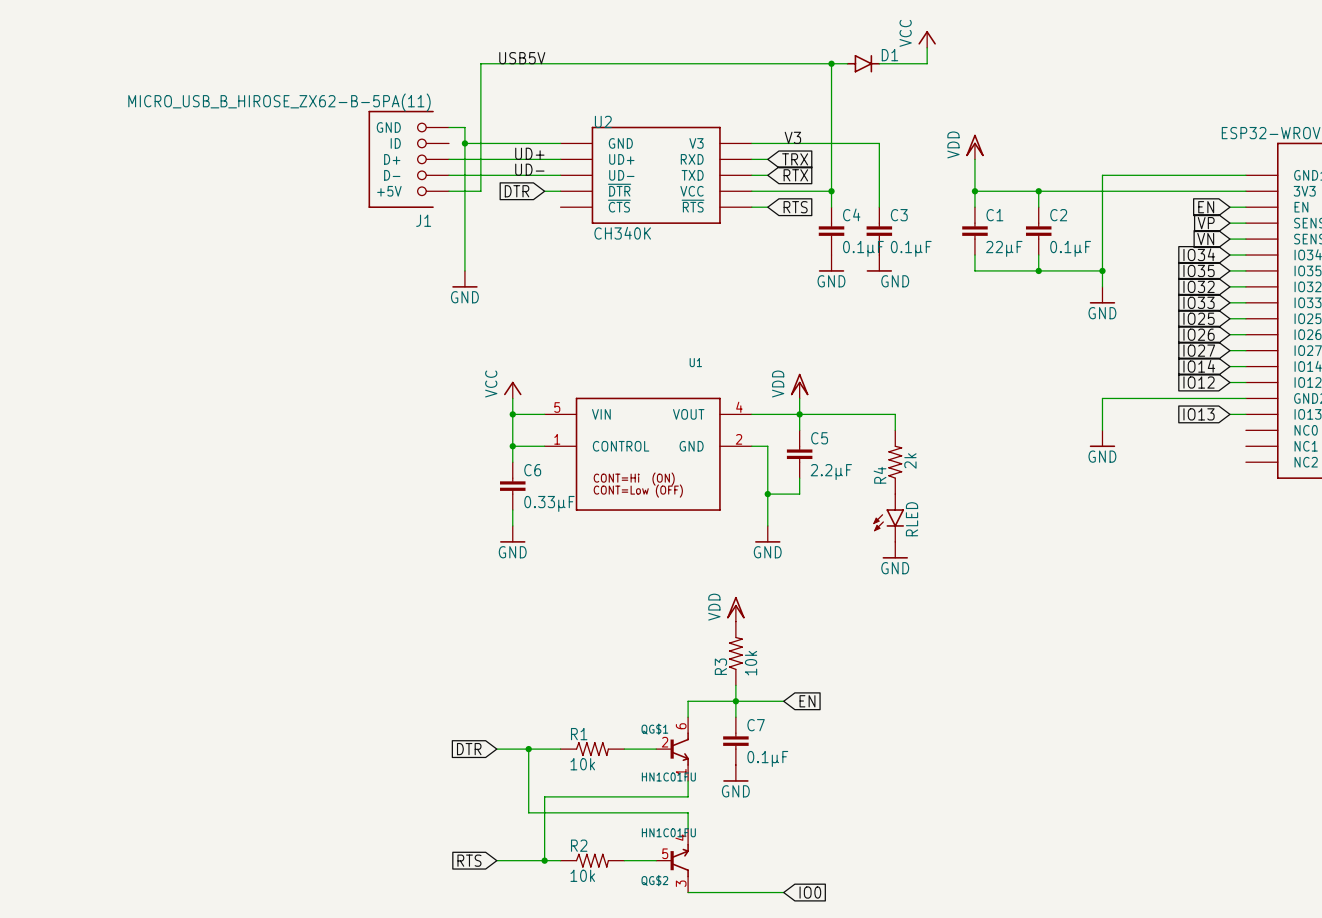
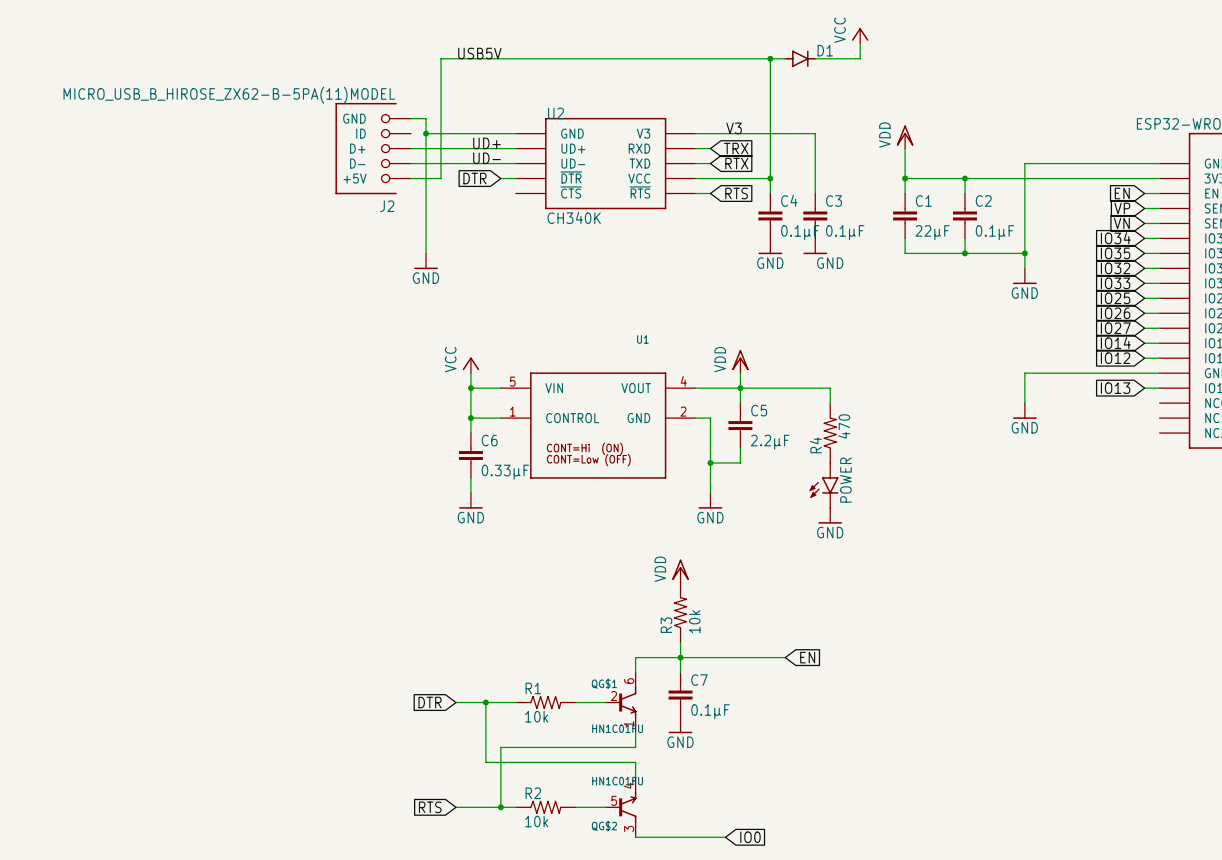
J1 value: MICRO_USB_B_HIROSE_ZX62-B-5PA(11) (279, 102) -> MICRO_USB_B_HIROSE_ZX62-B-5PA(11)MODEL (229, 95)
J1 name: J1 (423, 220) -> J2 (387, 206)
R4 value: 2k (910, 460) -> 470 (844, 426)
RLED name: RLED (912, 519) -> POWER (845, 480)
wire: none -> (725, 657) (785, 657)
global label position: EN (807, 701) -> EN (807, 657)

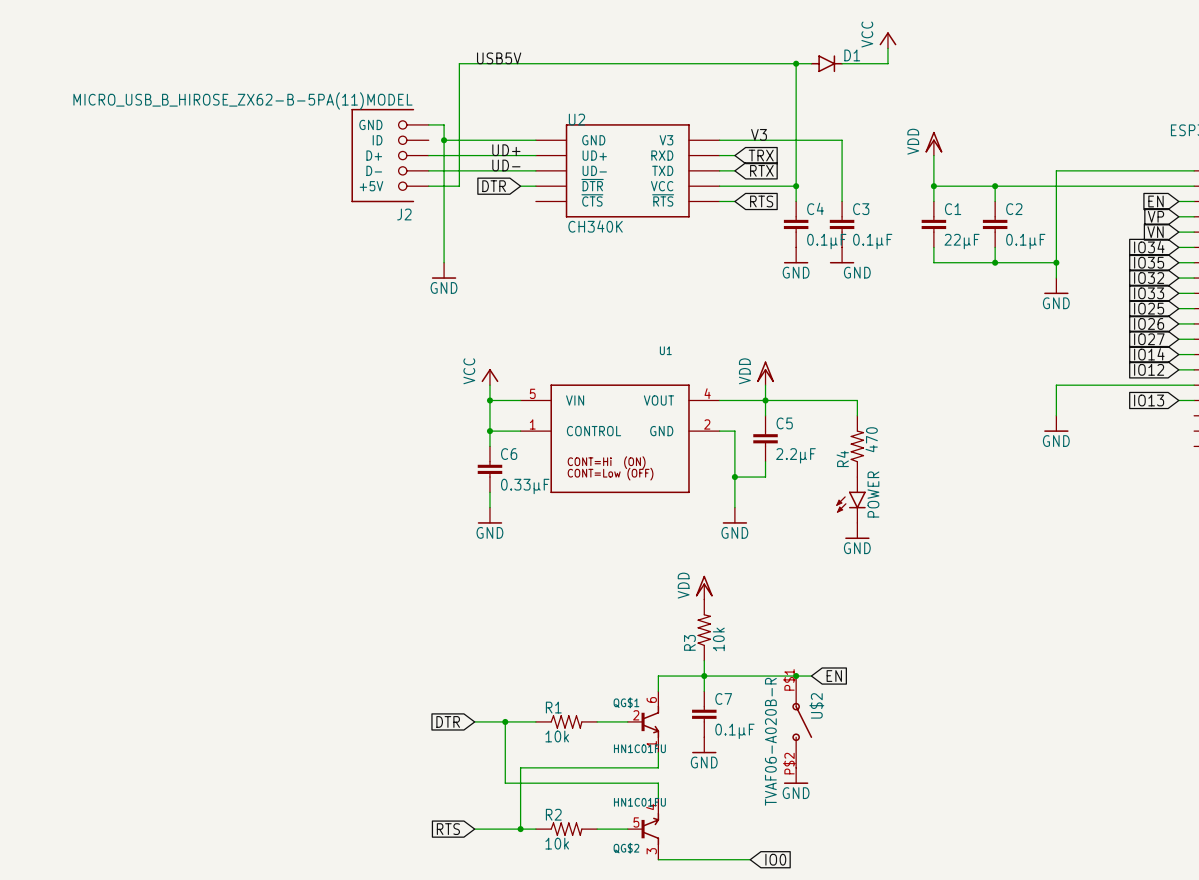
junction: none -> (796, 676)
U$2: none -> TVAF06-A020B-R (802, 721)
power symbol: none -> GND (796, 775)

